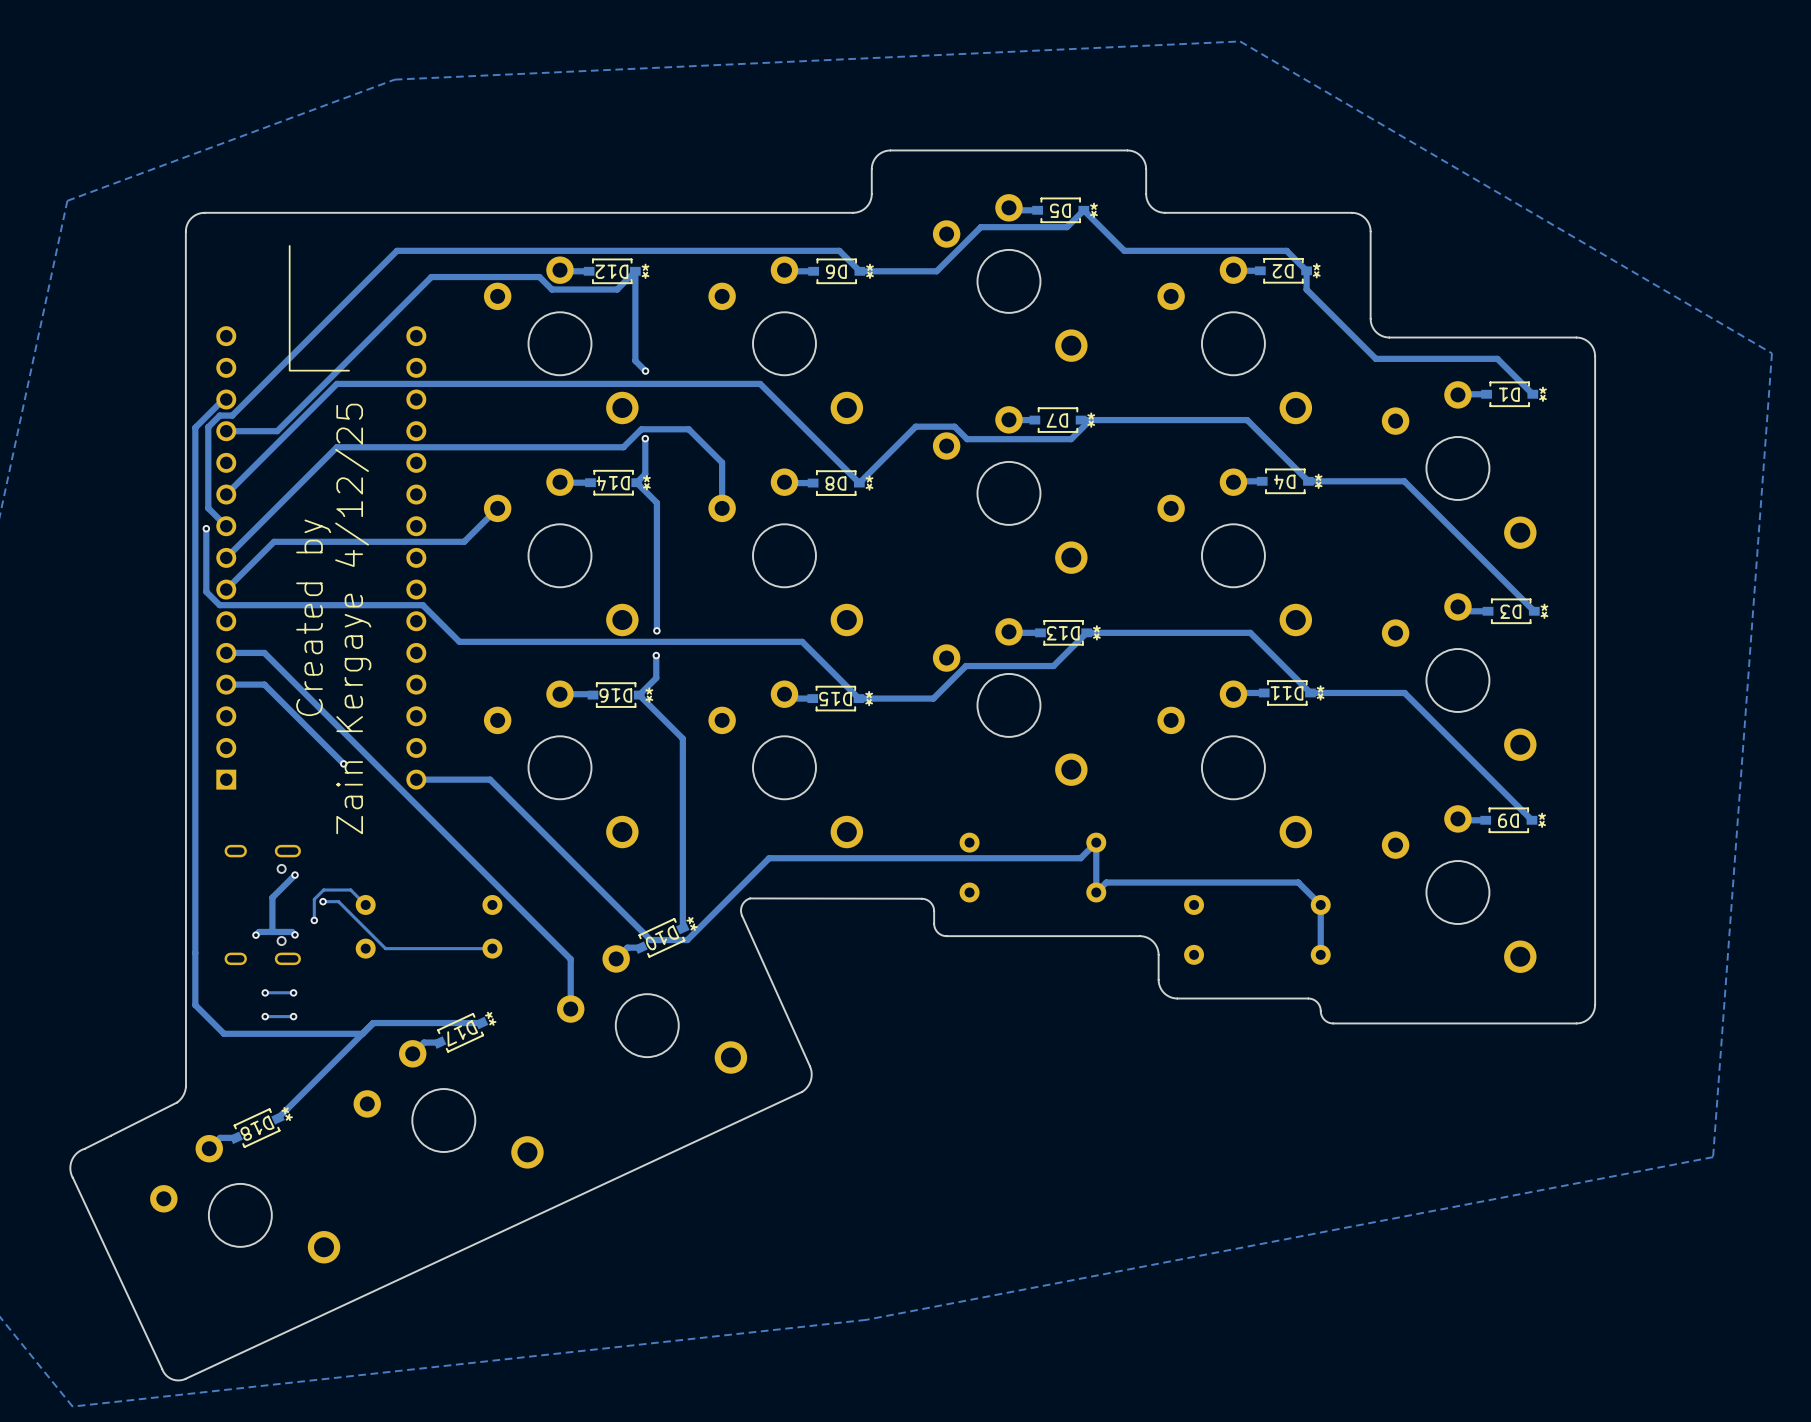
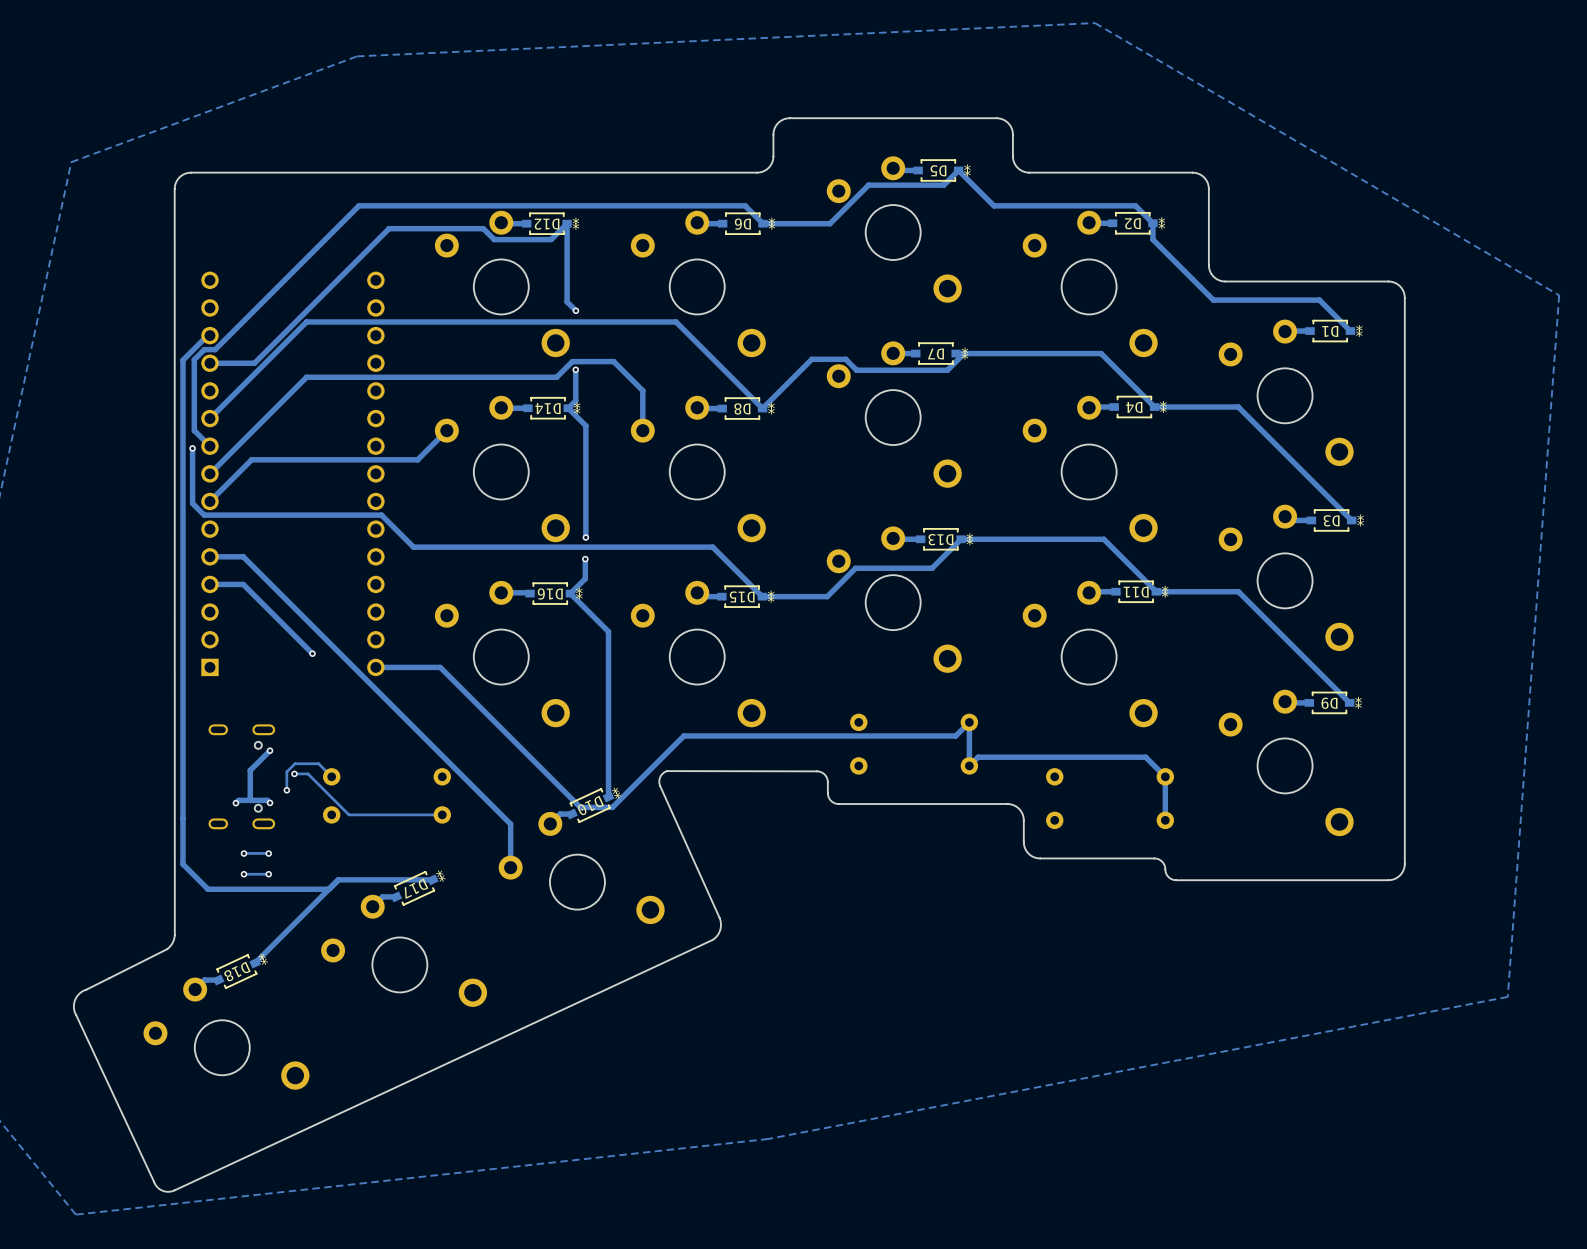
text: L (319, 308) -> none
text: Created by (313, 617) -> none
text: Zain Kergaye 4/12/25 (353, 618) -> none

